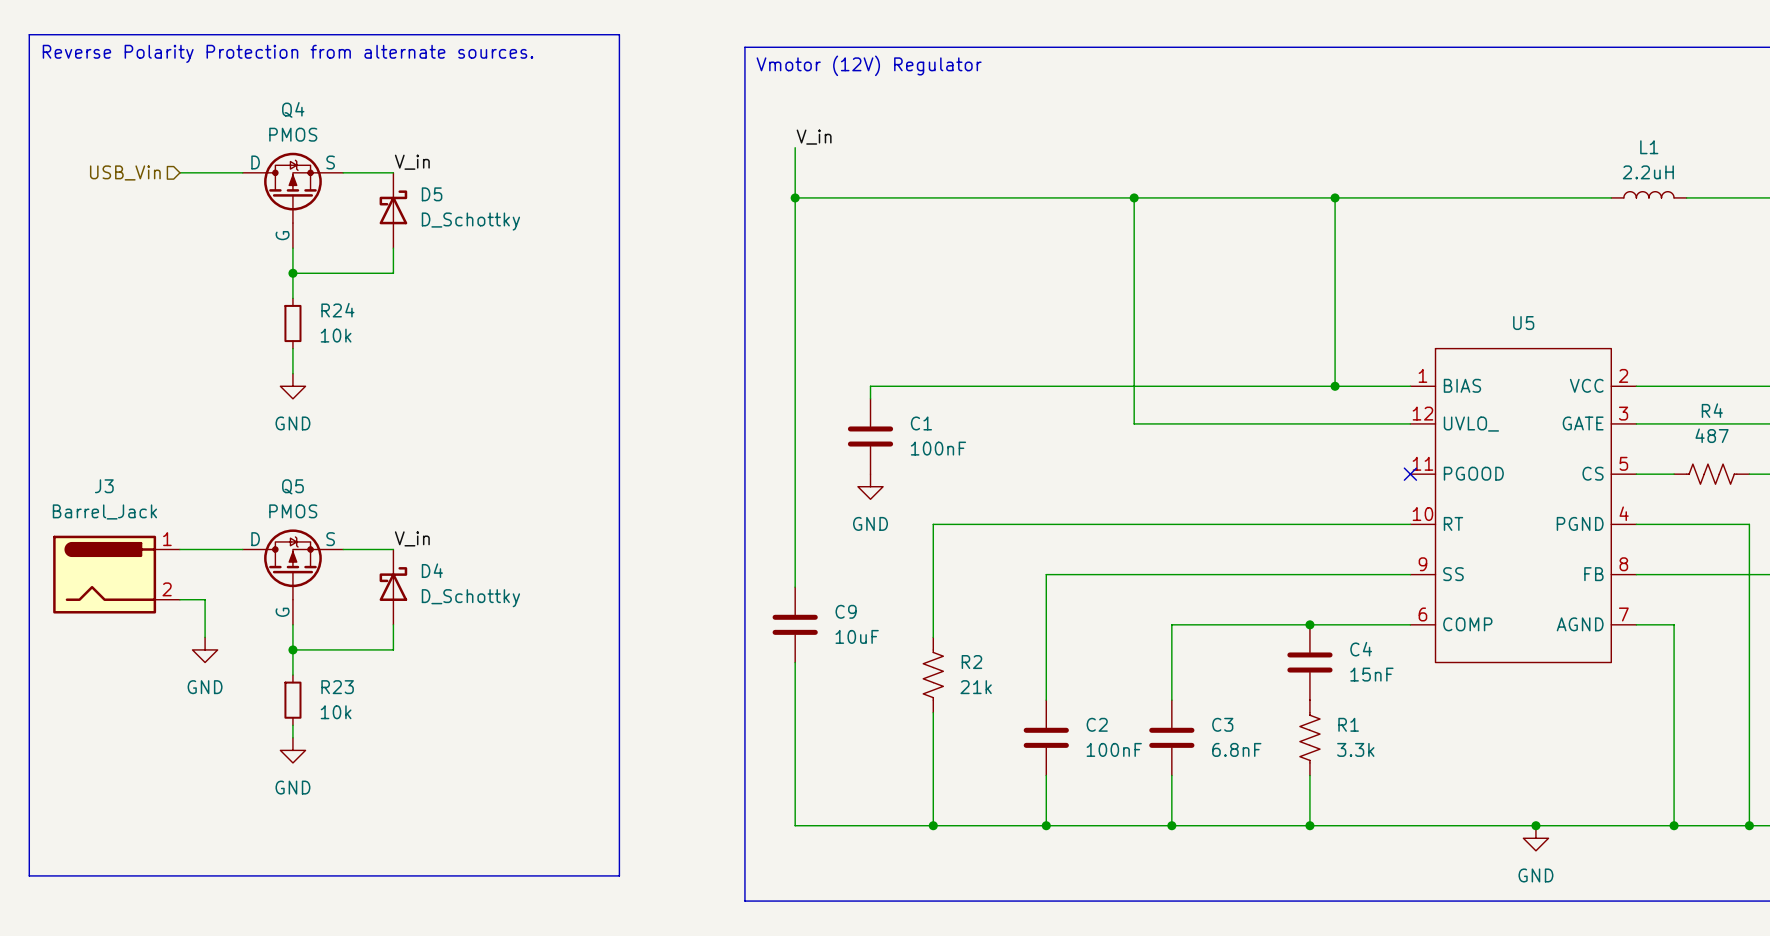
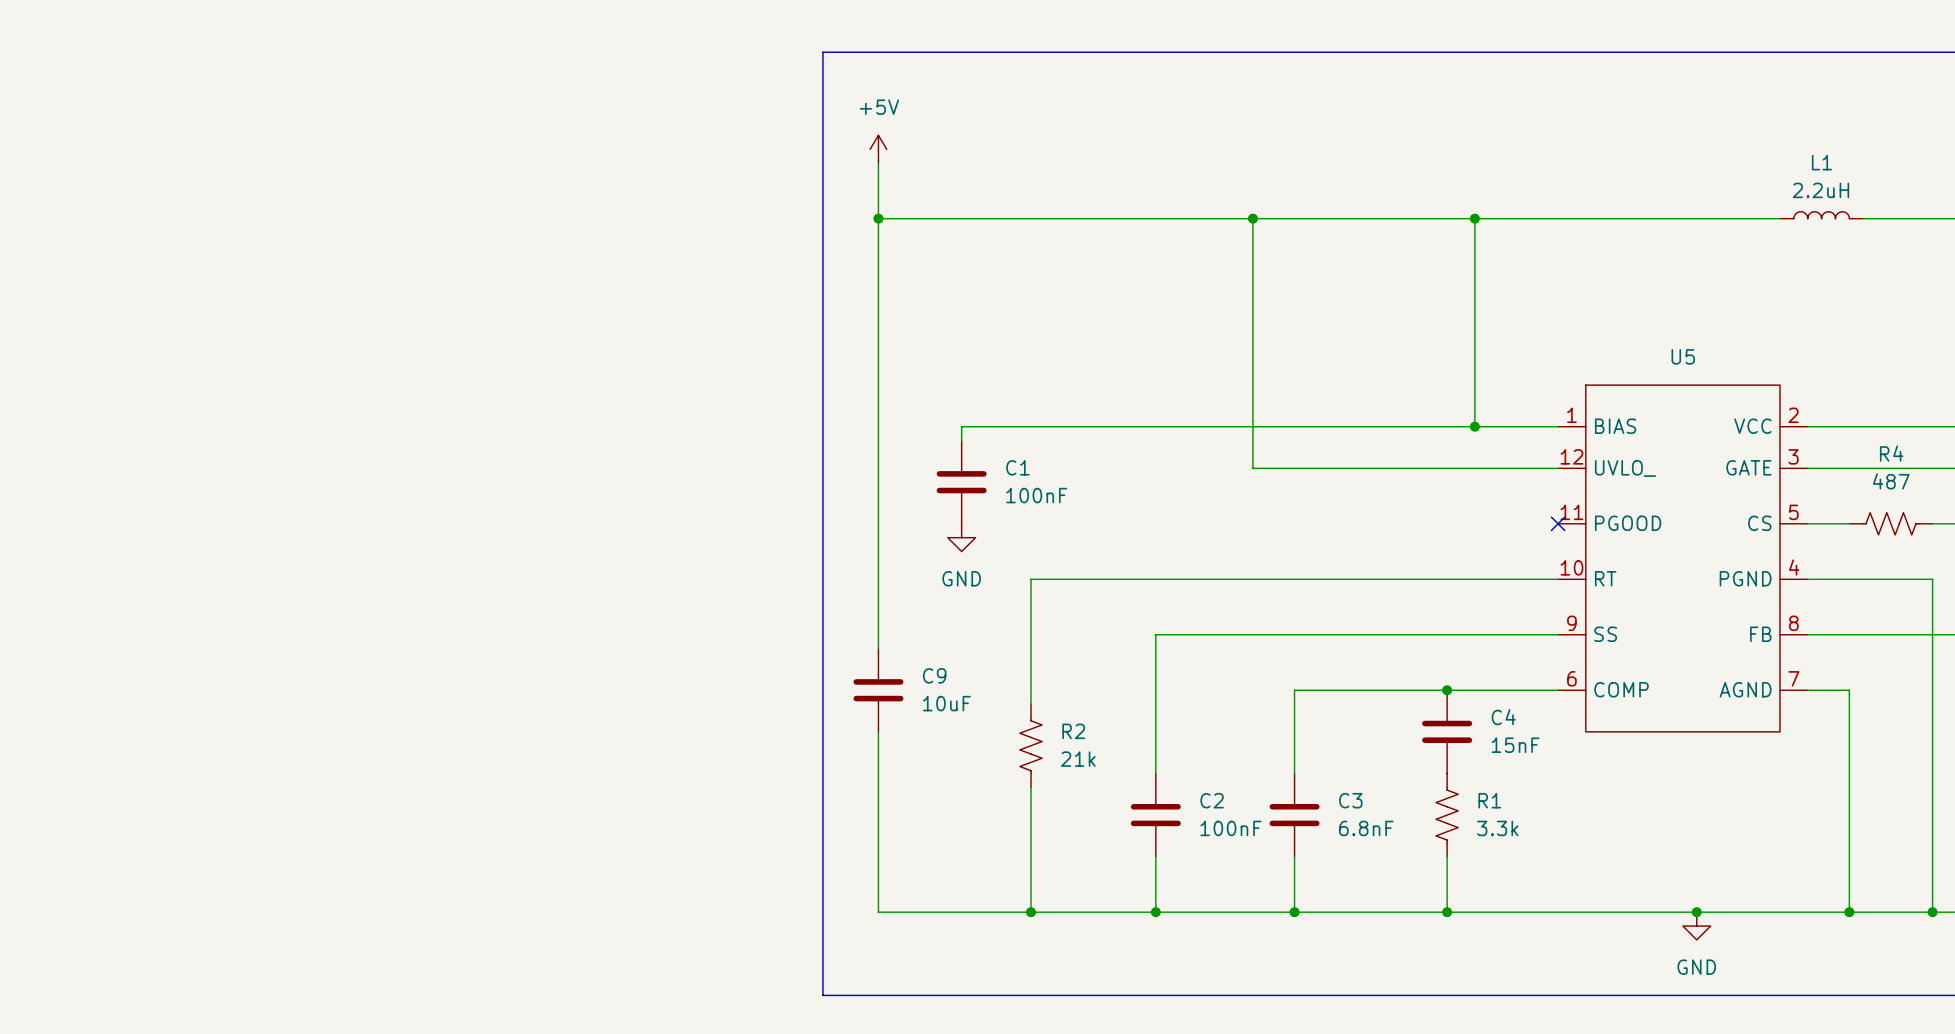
line: (29, 34) (619, 34) (619, 875) (29, 875) (29, 34) -> none
text: Reverse Polarity Protection from alternate sources. (287, 53) -> none
text: Vmotor (12V) Regulator (869, 65) -> none
power symbol: none -> +5V (878, 149)
label: V_in (814, 137) -> none
label: V_in (412, 162) -> none
hierarchical label: USB_Vin (125, 172) -> none
wire: (179, 172) (242, 172) -> none
wire: (343, 172) (393, 172) -> none
Q4: PMOS (292, 200) -> none
D5: D_Schottky (393, 210) -> none
wire: (292, 248) (292, 298) -> none
wire: (393, 248) (393, 273) (292, 273) -> none
junction: (292, 273) -> none
R24: 10k (292, 323) -> none
wire: (292, 348) (292, 373) -> none
power symbol: GND (292, 386) -> none
label: V_in (412, 538) -> none
wire: (179, 549) (242, 549) -> none
wire: (343, 549) (393, 549) -> none
J3: Barrel_Jack (116, 574) -> none
Q5: PMOS (292, 577) -> none
D4: D_Schottky (393, 587) -> none
wire: (179, 599) (205, 599) (205, 637) -> none
wire: (292, 624) (292, 675) -> none
wire: (393, 624) (393, 649) (292, 649) -> none
power symbol: GND (205, 649) -> none
junction: (292, 649) -> none
R23: 10k (292, 700) -> none
wire: (292, 725) (292, 737) -> none
power symbol: GND (292, 750) -> none

